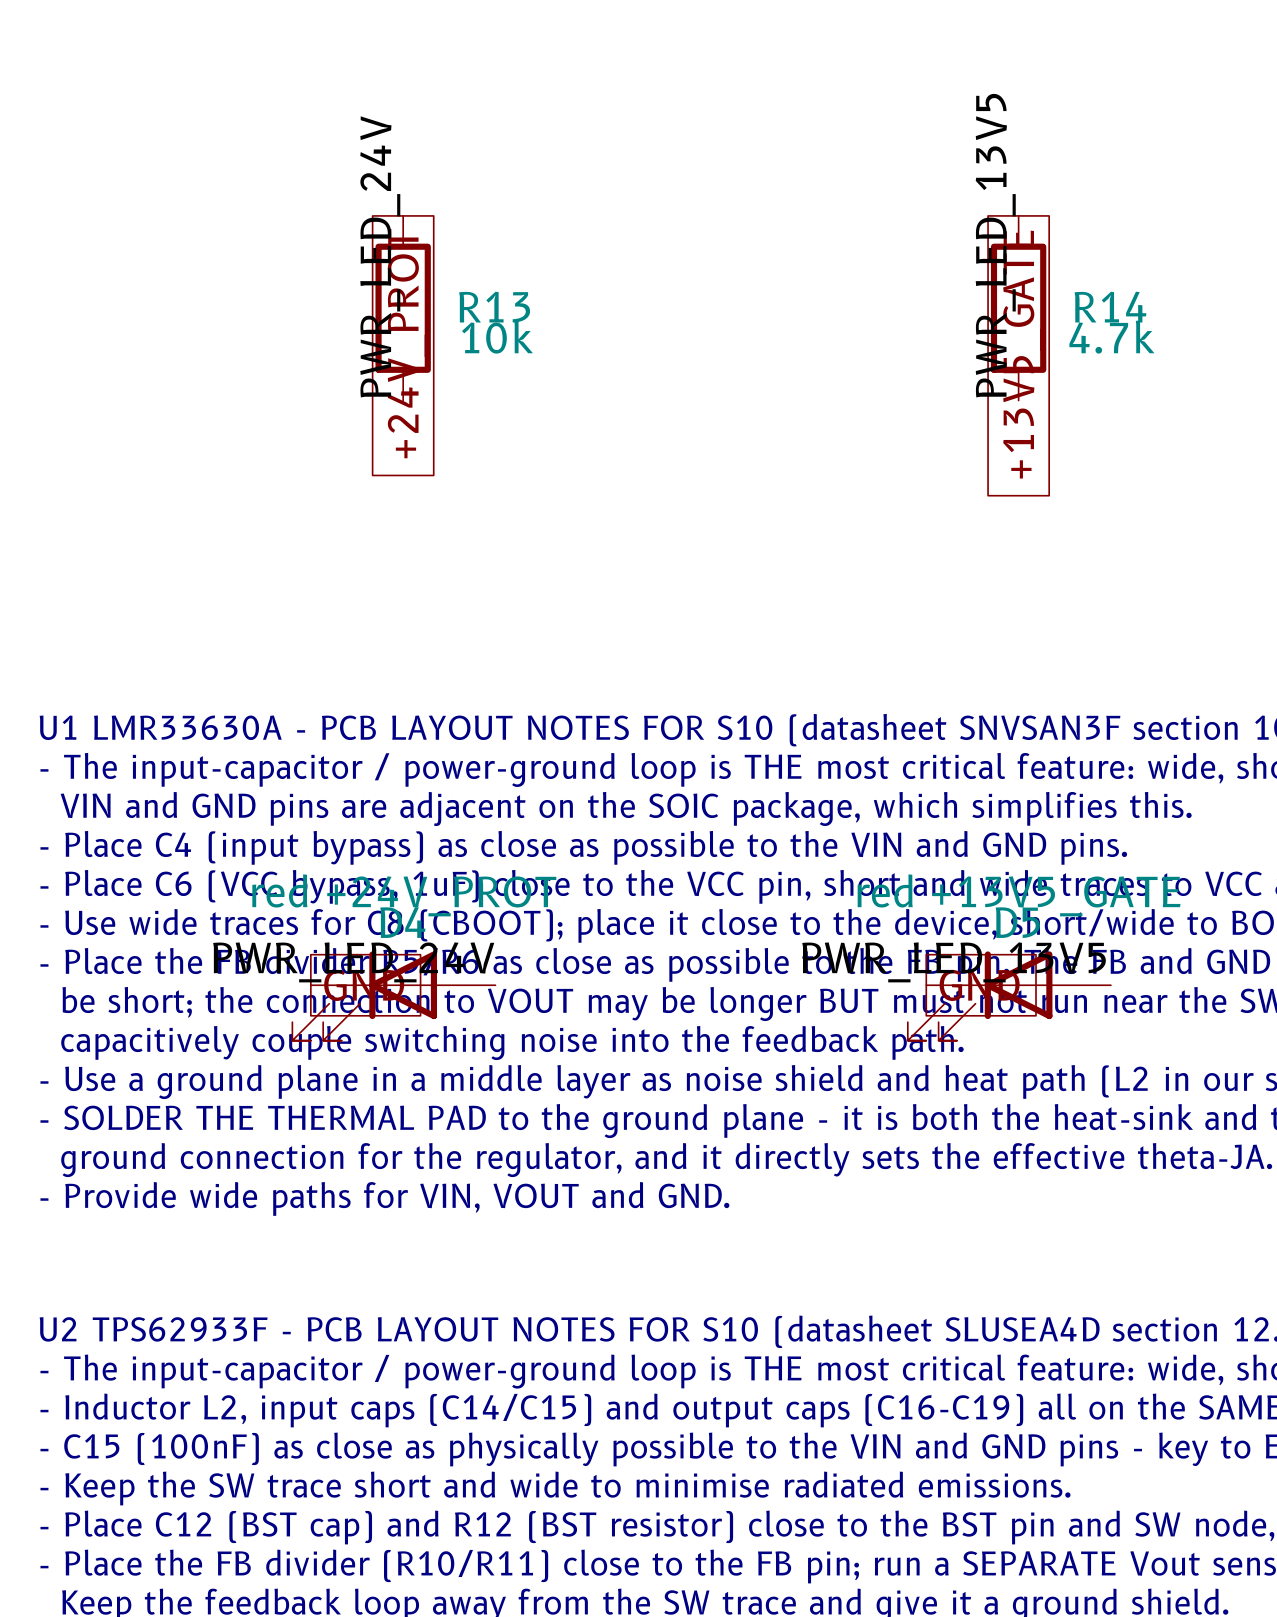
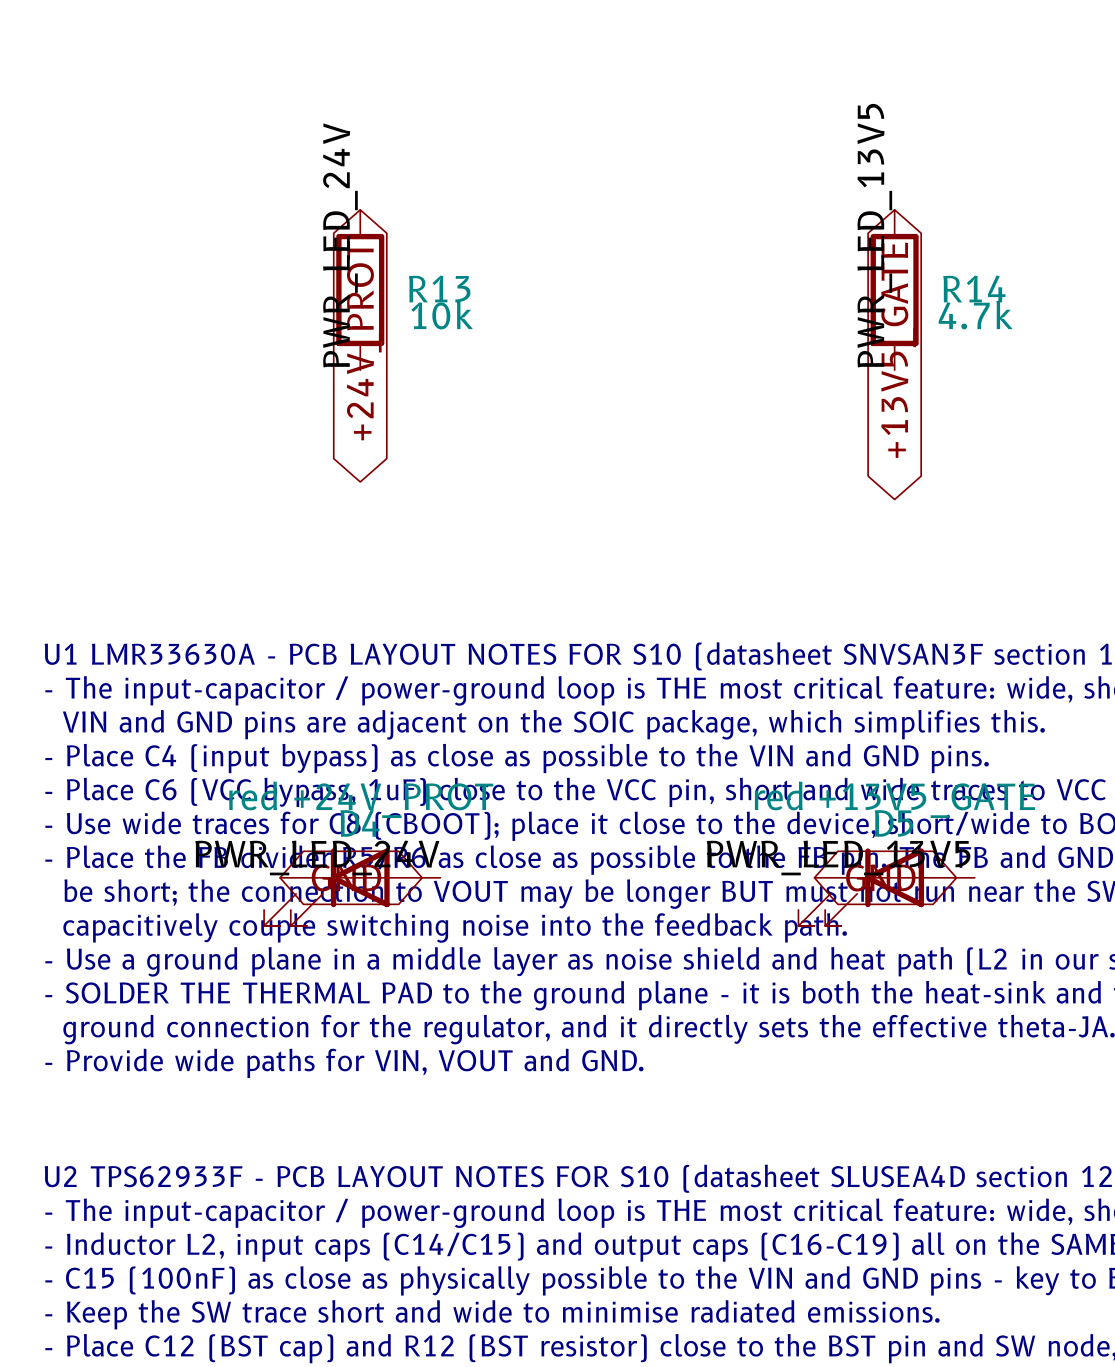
global label shape: passive (407, 343) -> bidirectional (364, 340)
global label shape: passive (1023, 354) -> bidirectional (898, 350)
global label shape: passive (364, 985) -> bidirectional (346, 877)
global label shape: passive (979, 985) -> bidirectional (880, 877)

